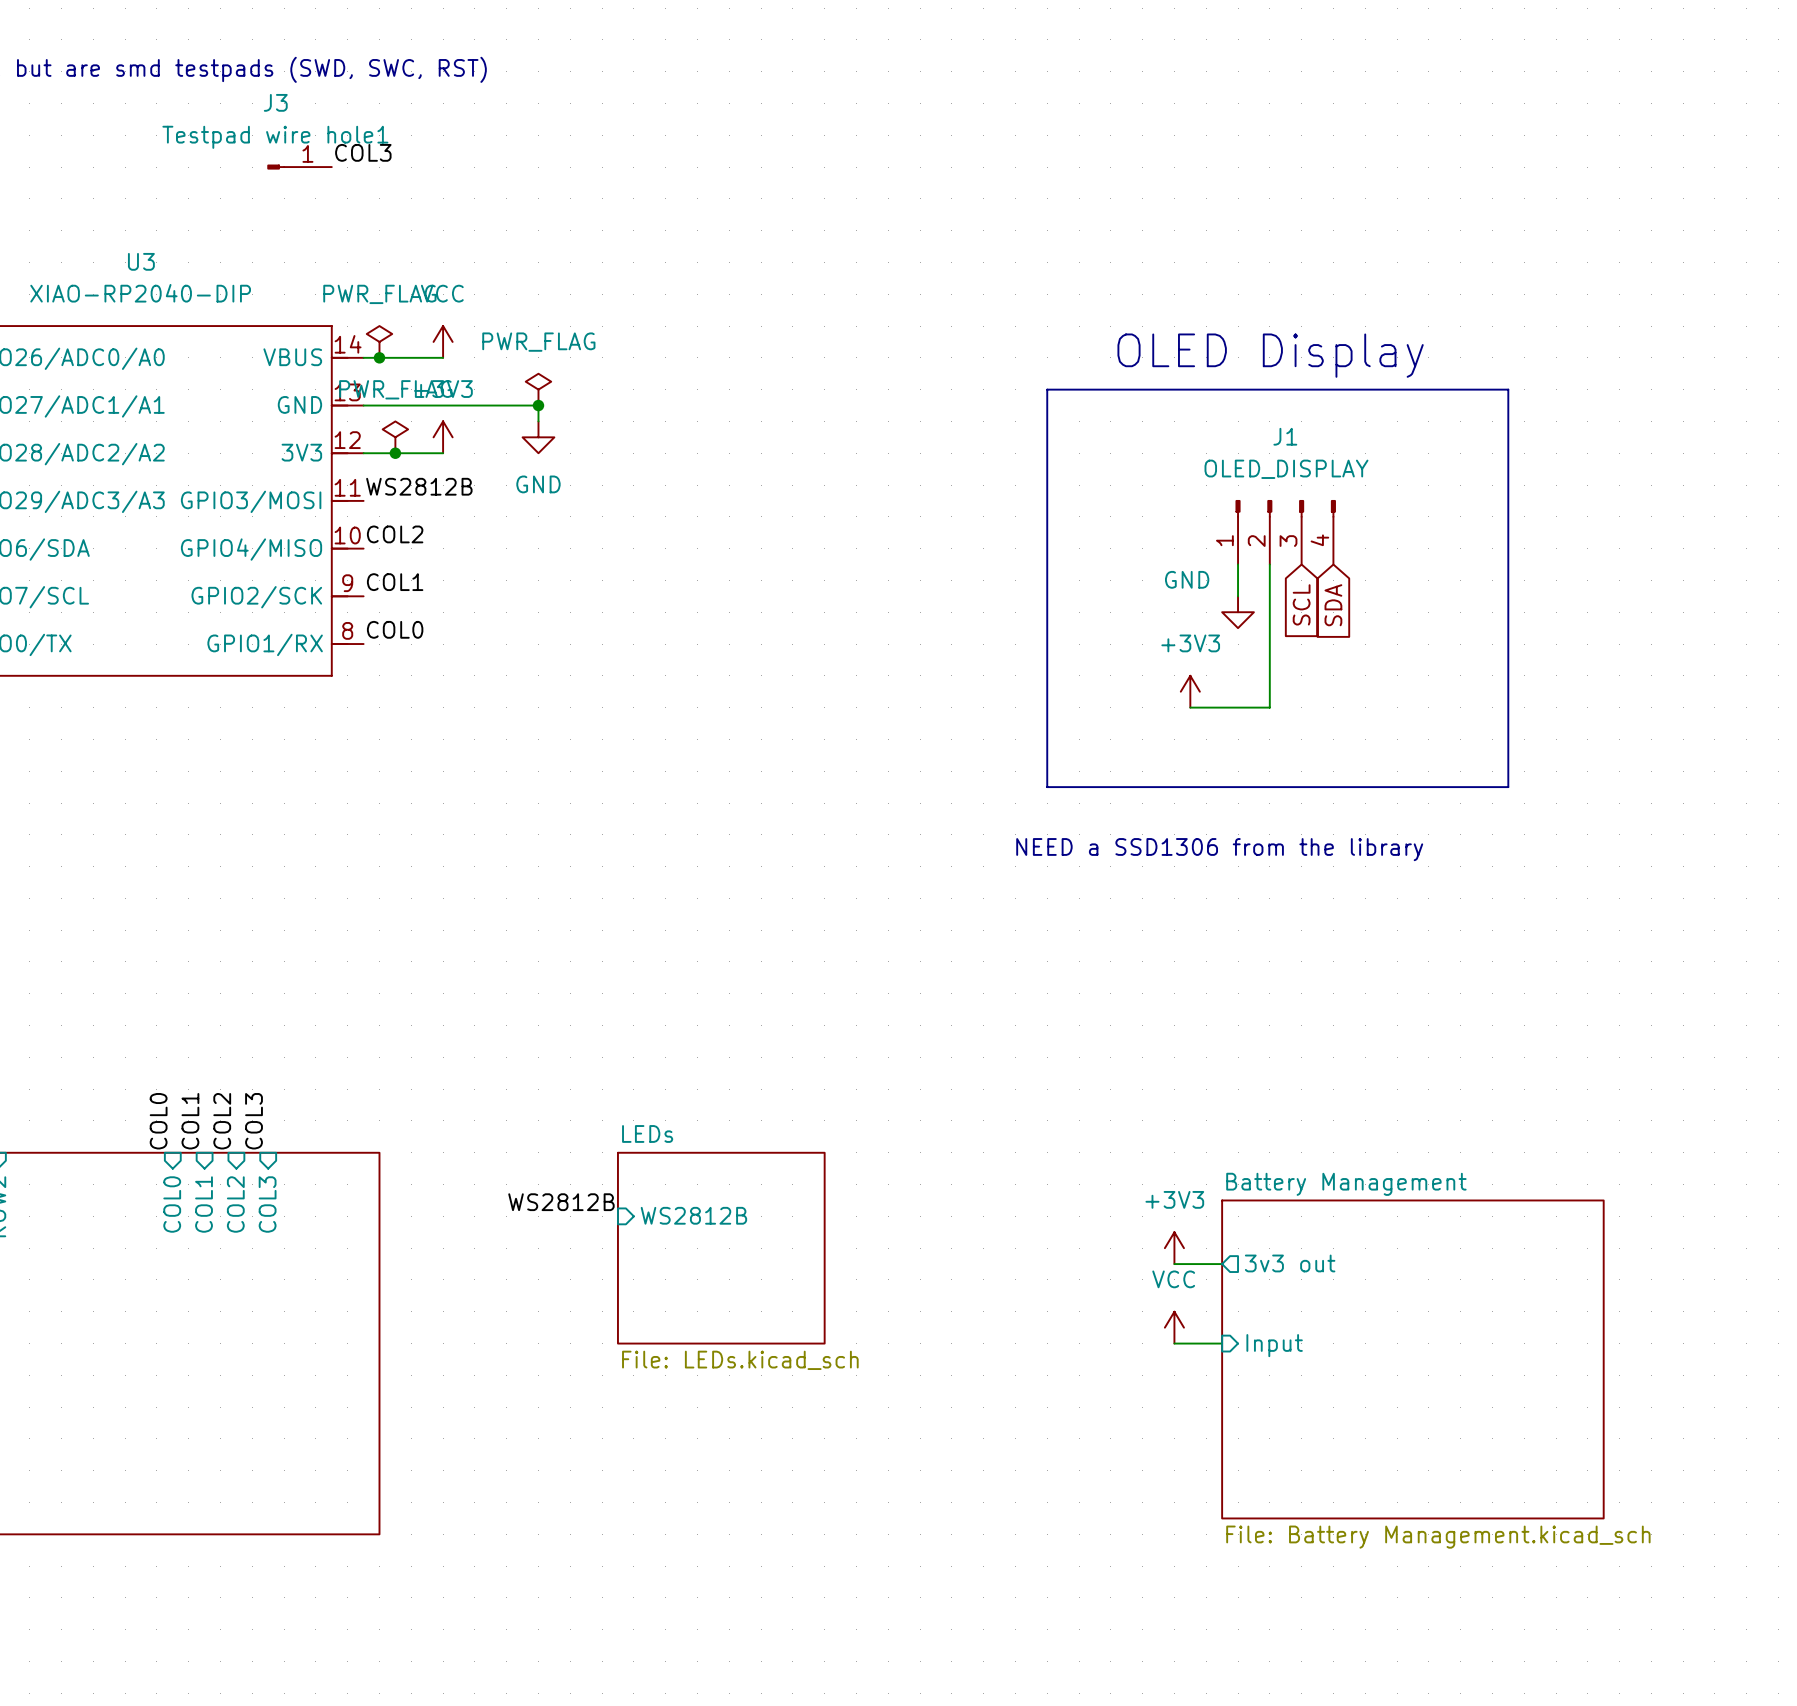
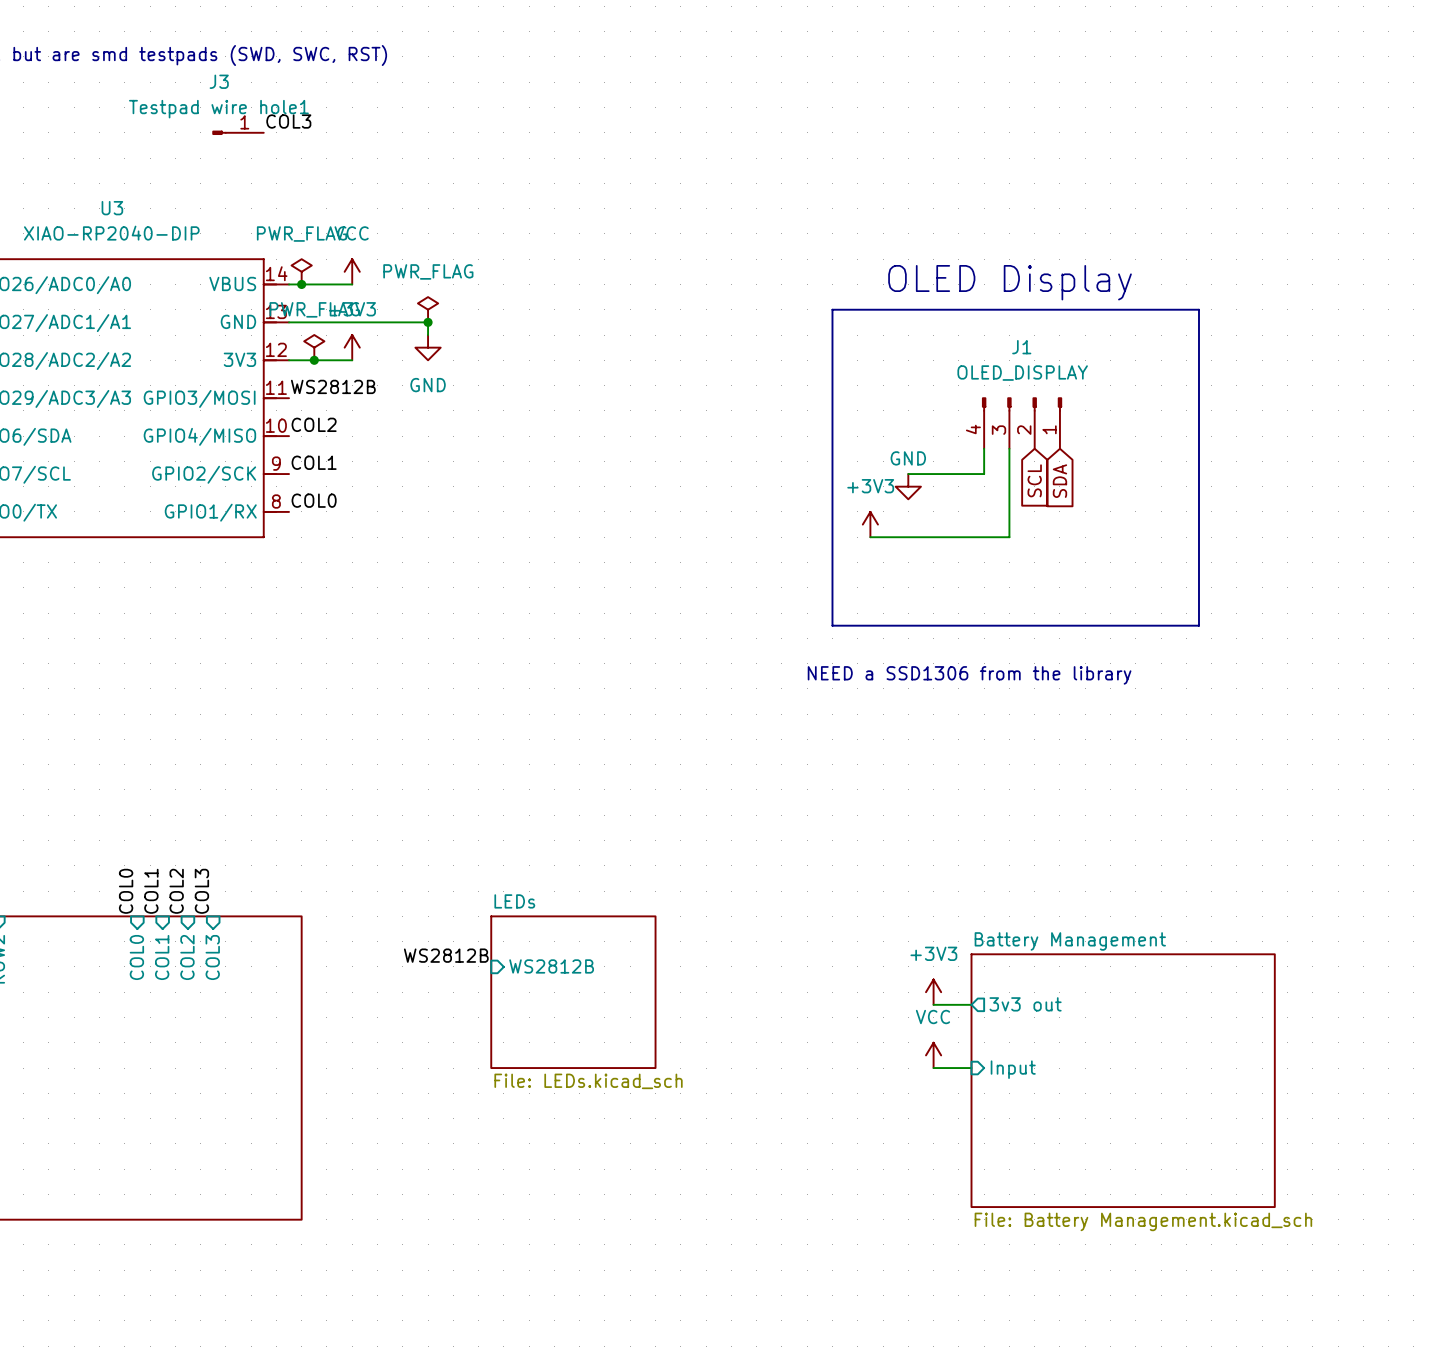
J1 flip: as is (1285, 508) -> left-right (1022, 404)
power symbol text position: GND (1187, 579) -> GND (908, 458)
wire: none -> (908, 474) (984, 474)
power symbol position: GND (1238, 612) -> GND (908, 486)
wire: (1269, 675) (1269, 707) (1190, 707) -> (1009, 537) (870, 537)
power symbol position: +3V3 (1190, 691) -> +3V3 (870, 524)

